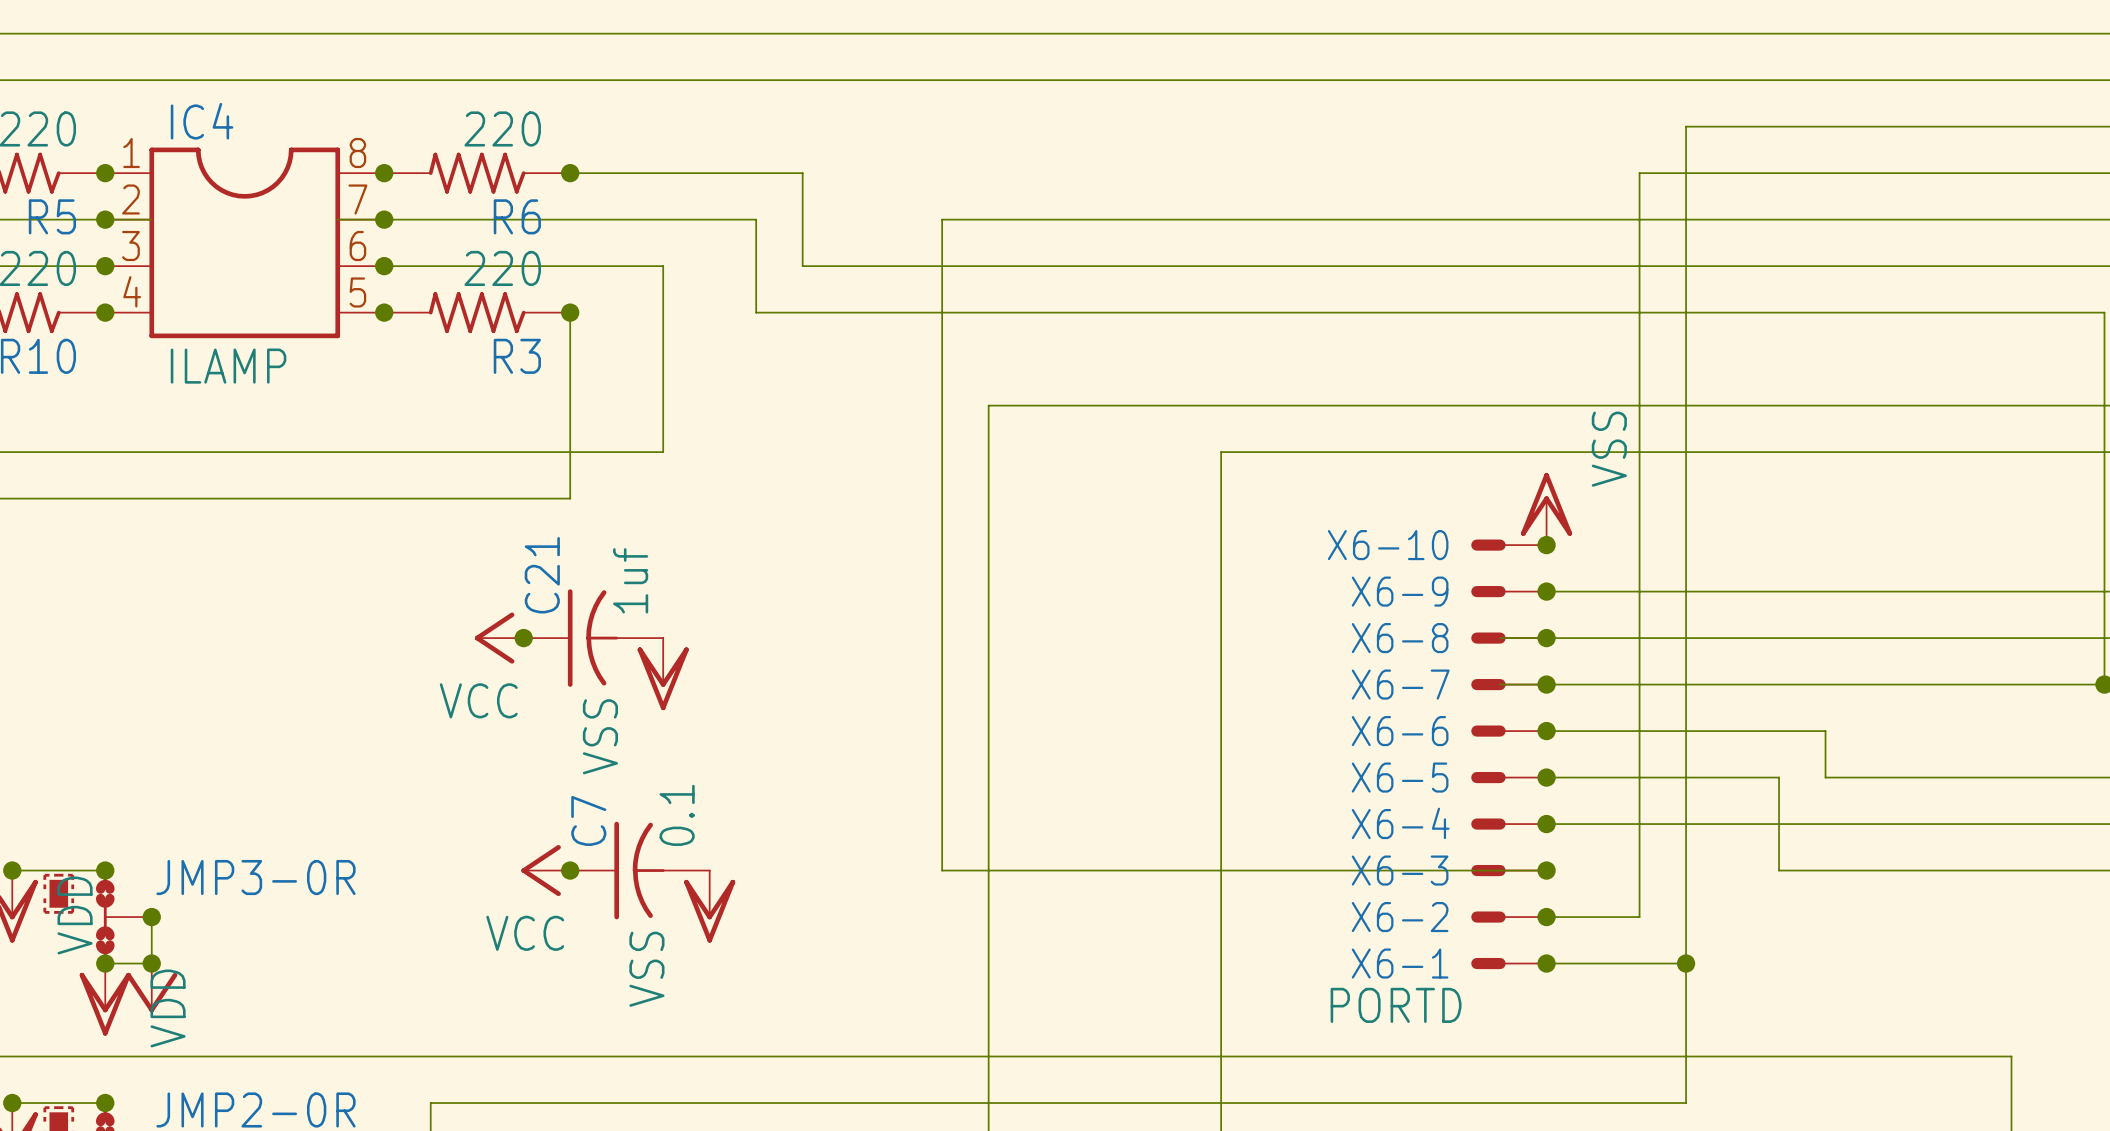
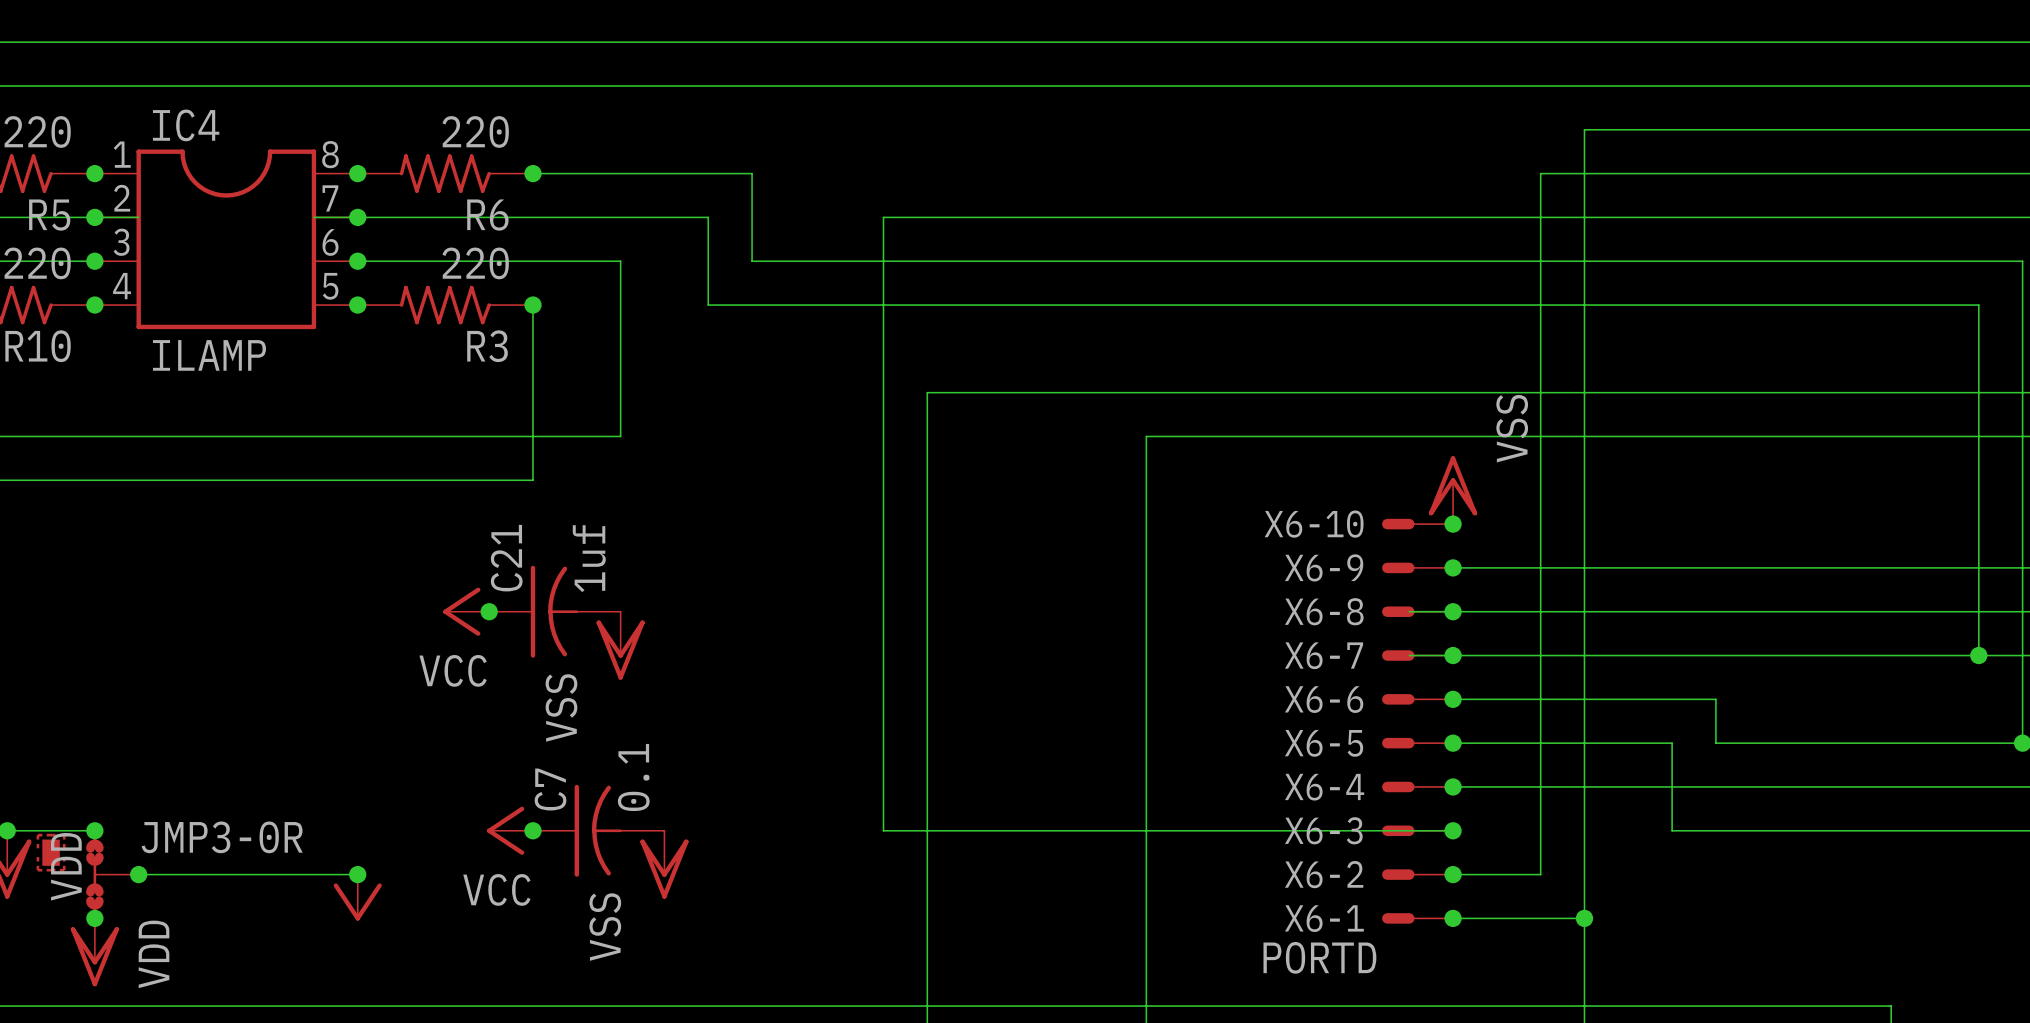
wire: (151, 917) (151, 963) (105, 963) -> (138, 874) (357, 874)
junction: none -> (357, 874)
junction: (151, 963) -> none
power symbol position: (151, 987) -> (357, 897)

